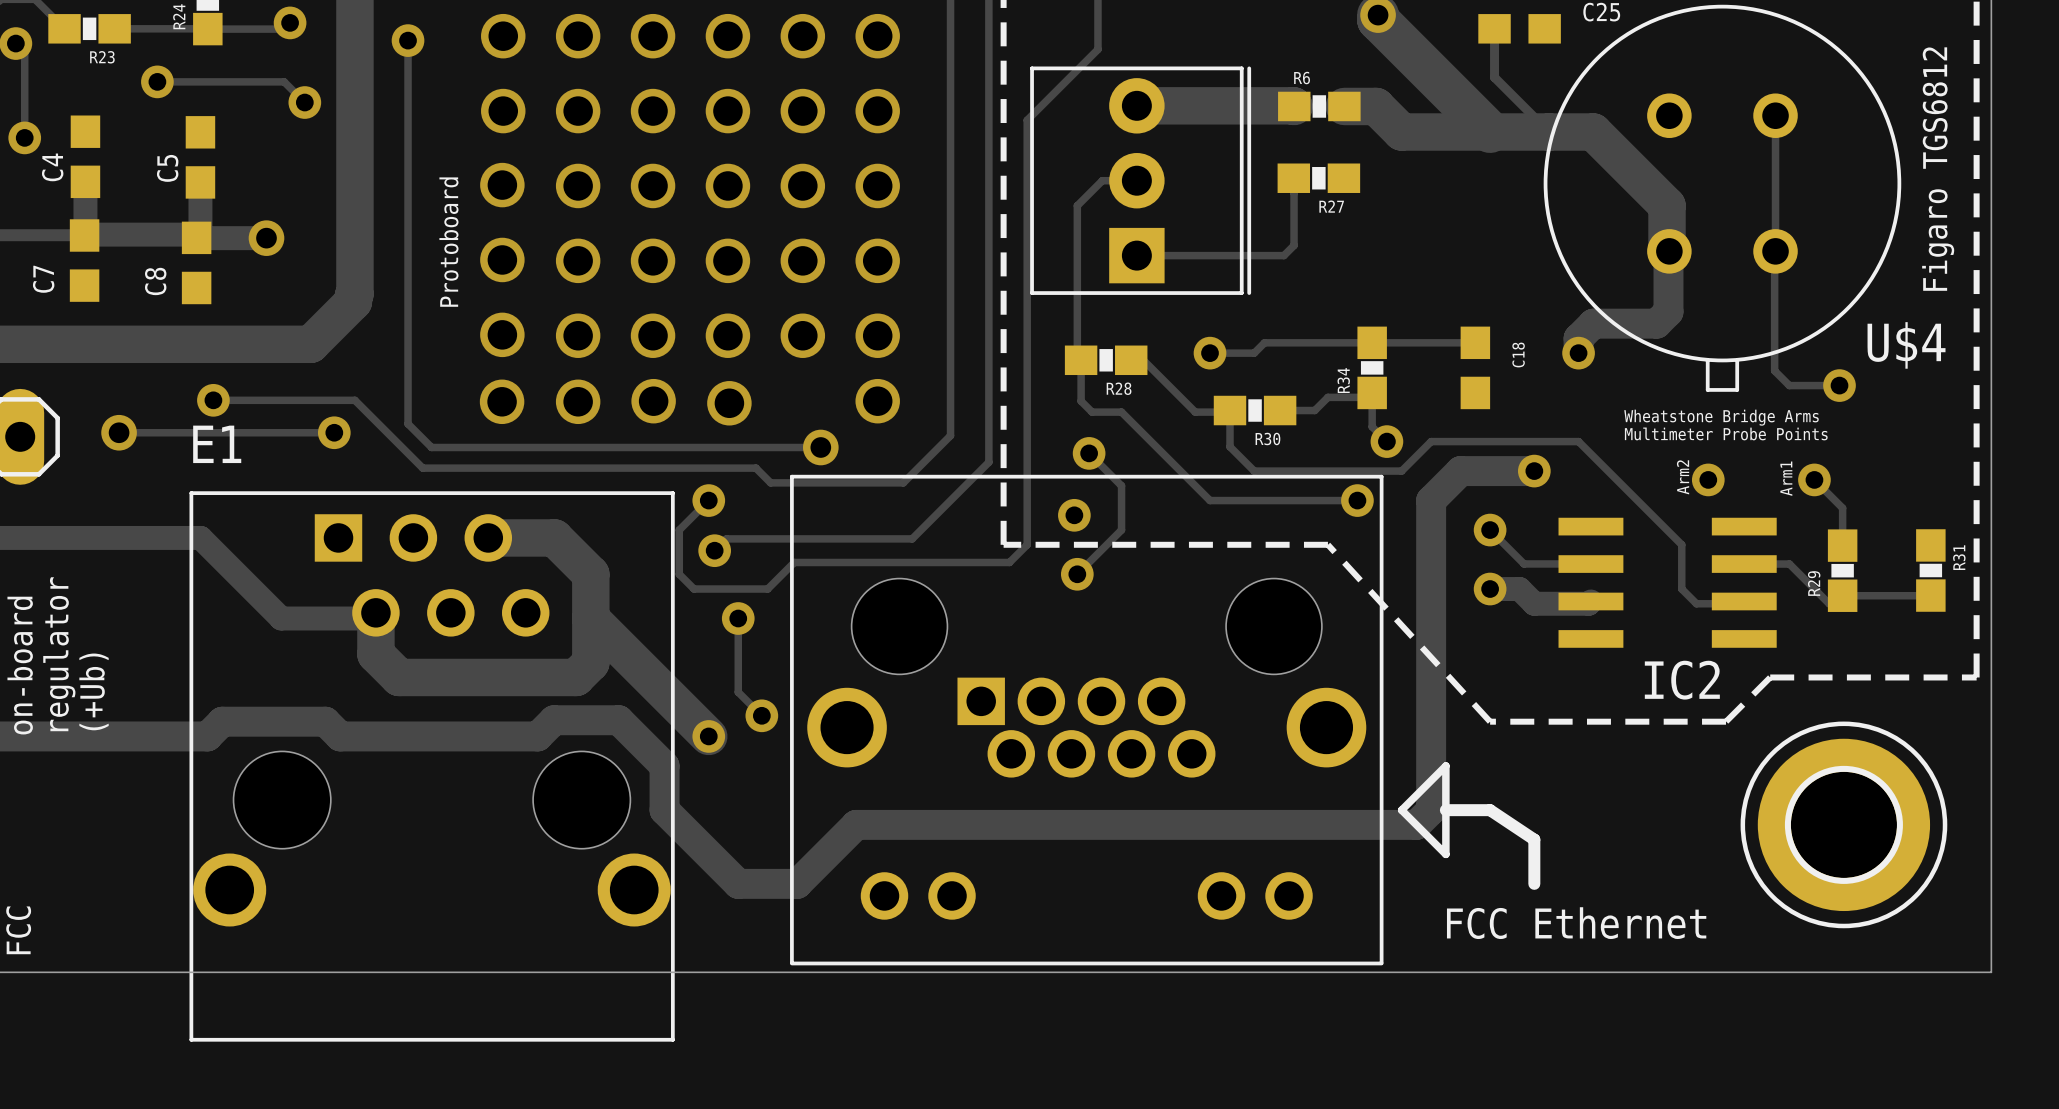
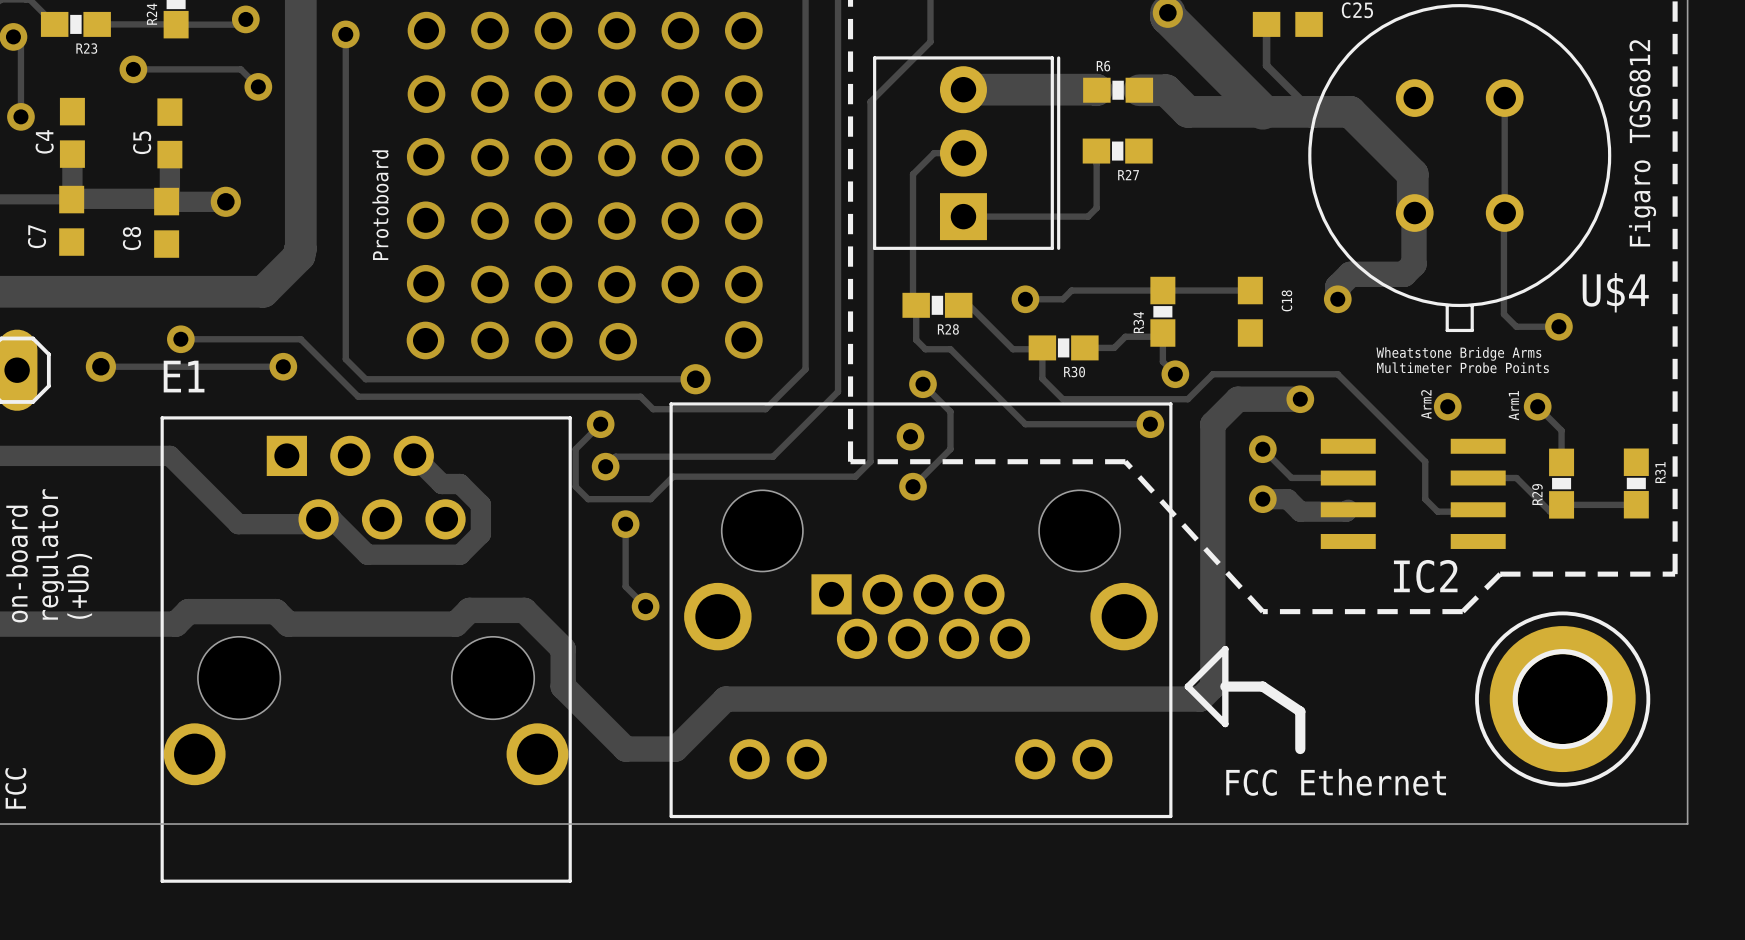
track: (488, 537) (554, 537) (590, 574) (590, 662) (576, 677) (399, 677) (375, 654) (375, 612) -> (413, 455) (441, 484) (460, 484) (480, 504) (480, 534) (460, 554) (367, 554) (332, 519) (318, 519)
track: (590, 618) (708, 736) -> none
via: (708, 736) -> none

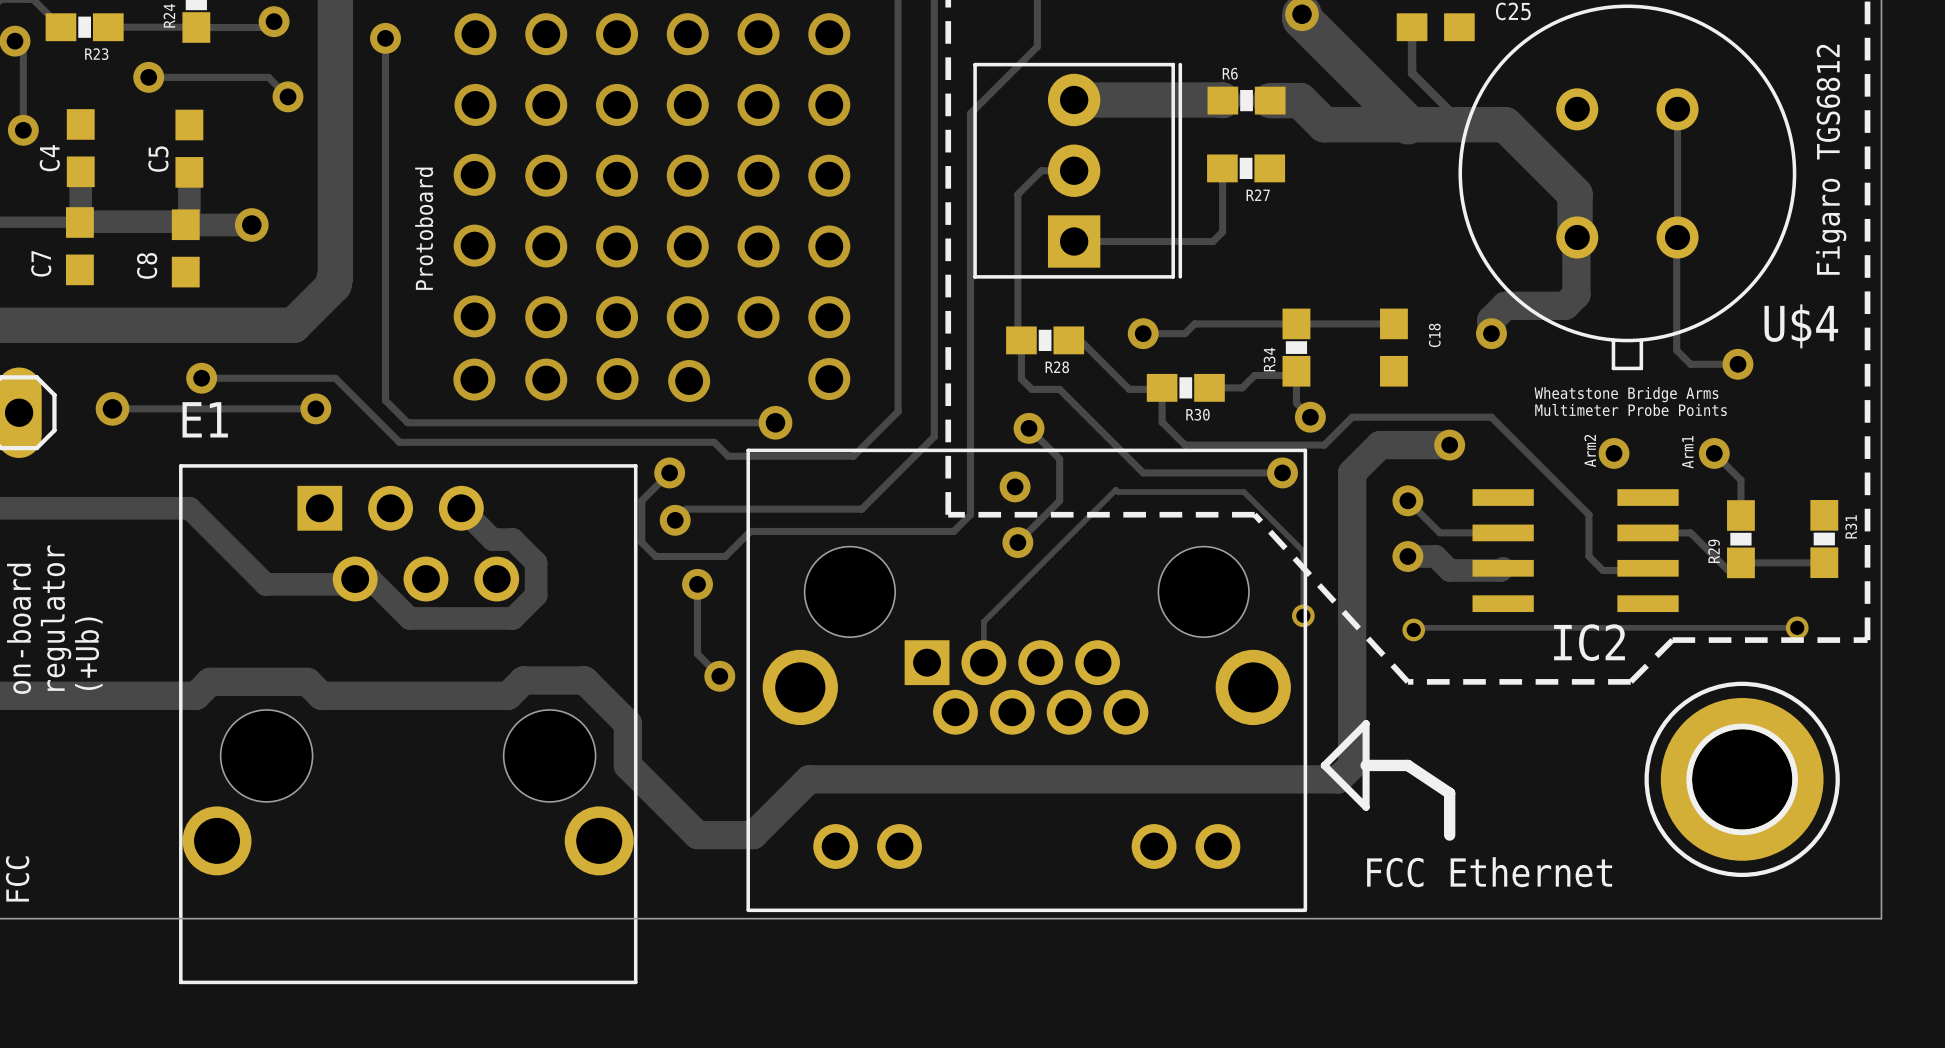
track: none -> (1303, 615) (1303, 551) (1243, 491) (1117, 491) (1115, 489) (983, 621) (983, 662)
via: none -> (1303, 615)
track: none -> (1797, 627) (1415, 627) (1413, 629)
via: none -> (1797, 627)
via: none -> (1413, 629)

